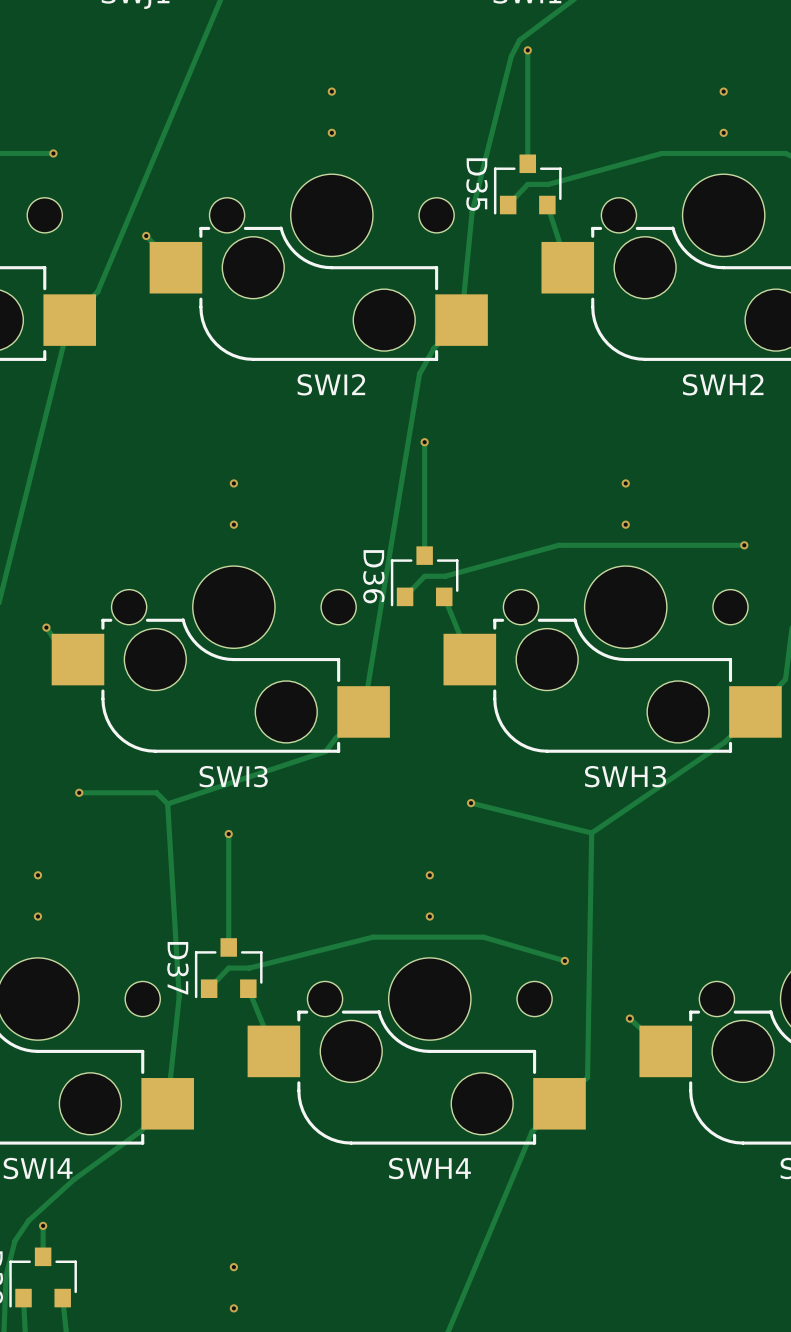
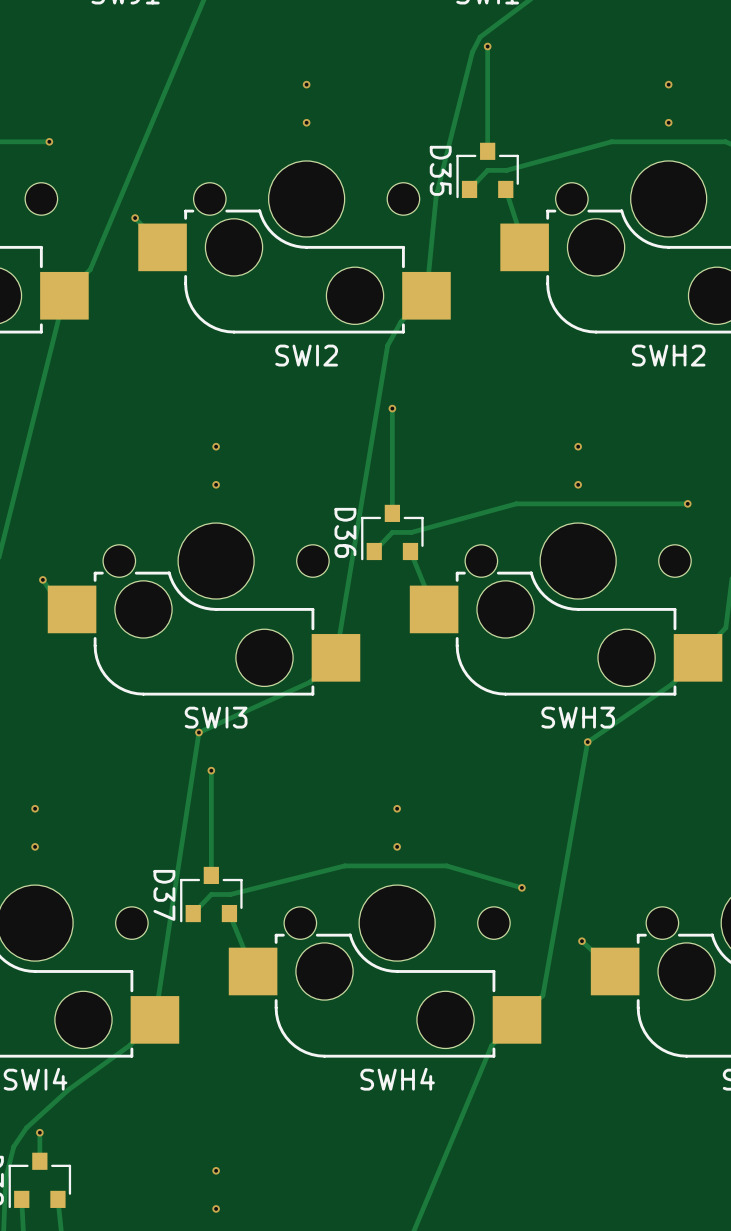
track: (755, 711) (724, 742) (591, 833) -> none
track: (335, 738) (325, 751) (167, 803) -> none
track: (79, 792) (156, 792) (167, 803) -> none
via: (79, 792) -> none
via: none -> (198, 732)
track: (167, 803) (179, 996) (167, 1103) -> (310, 682) (198, 732) (154, 1019)
track: (471, 803) (591, 833) -> none
via: (471, 803) -> none
via: none -> (587, 742)
track: (591, 833) (587, 1077) -> (698, 657) (672, 683) (587, 742) (542, 995)

